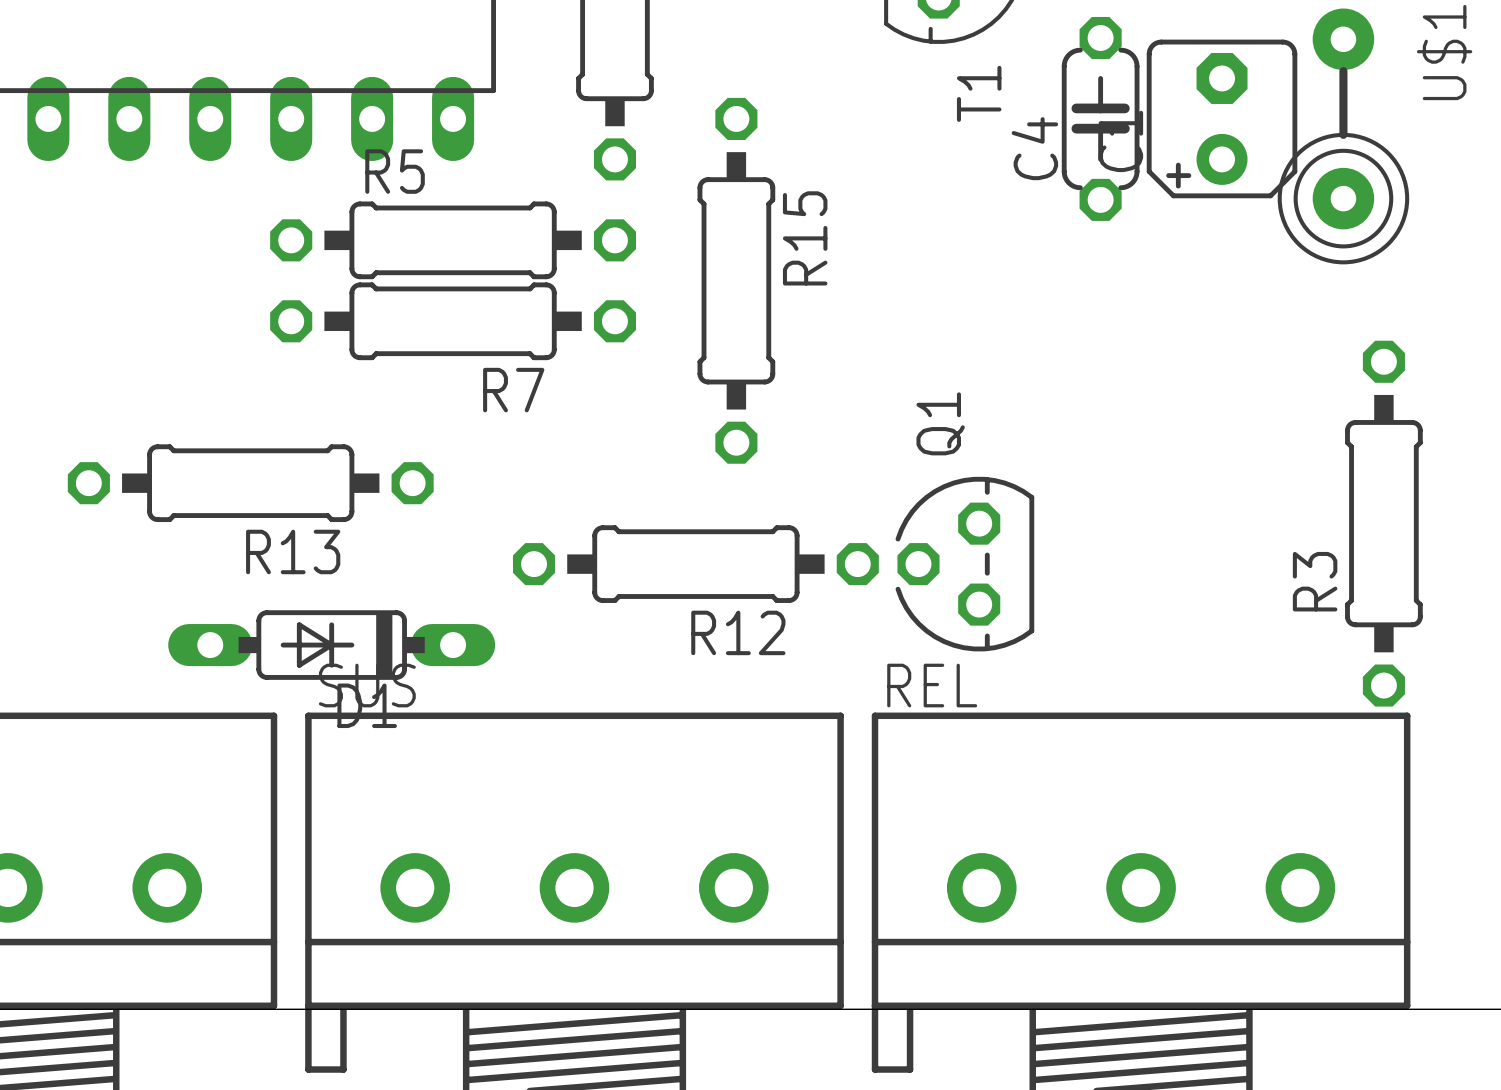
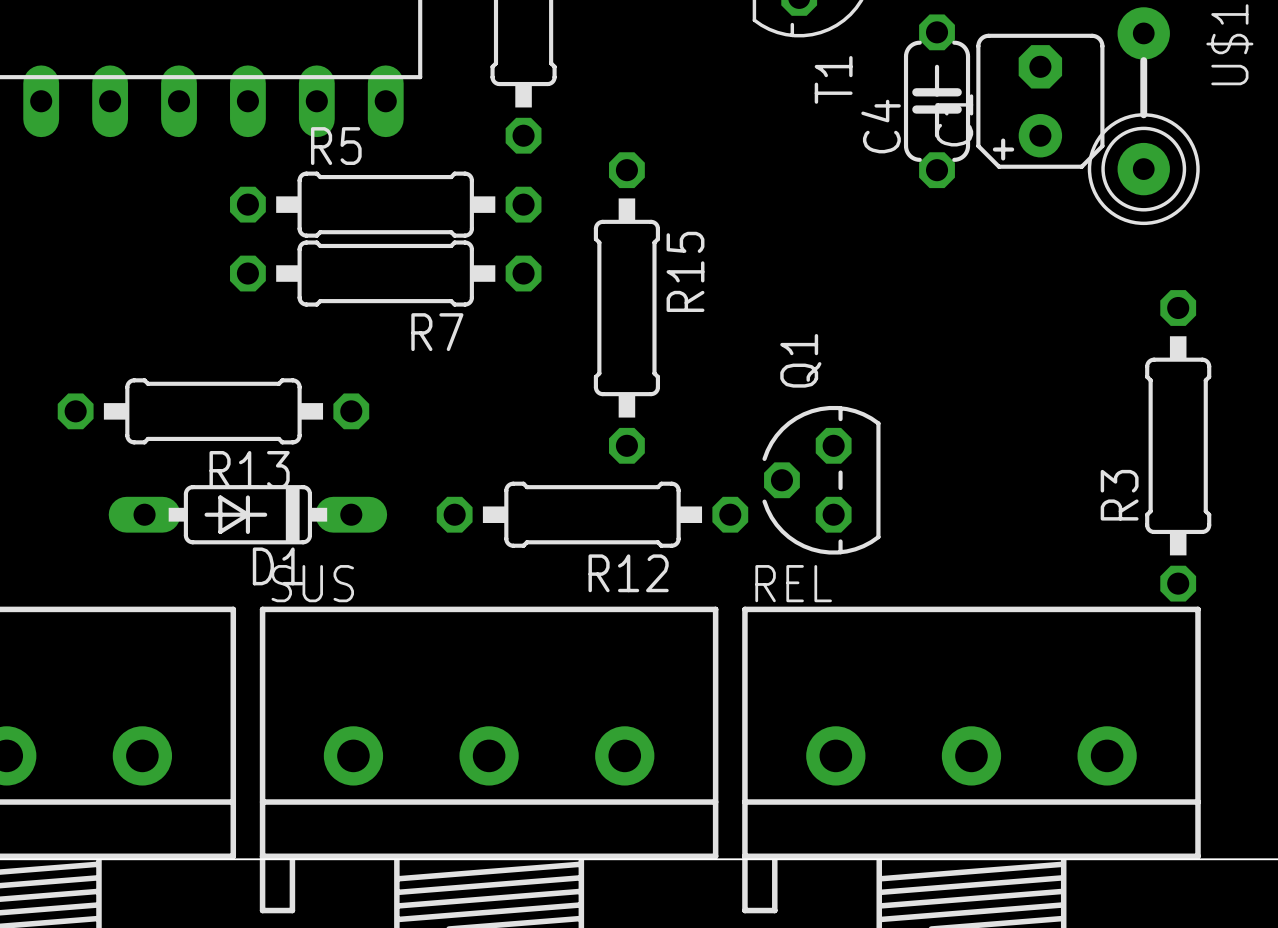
R15 position: (736, 280) -> (626, 307)
R12 position: (695, 564) -> (592, 514)
D1 position: (331, 645) -> (247, 514)

